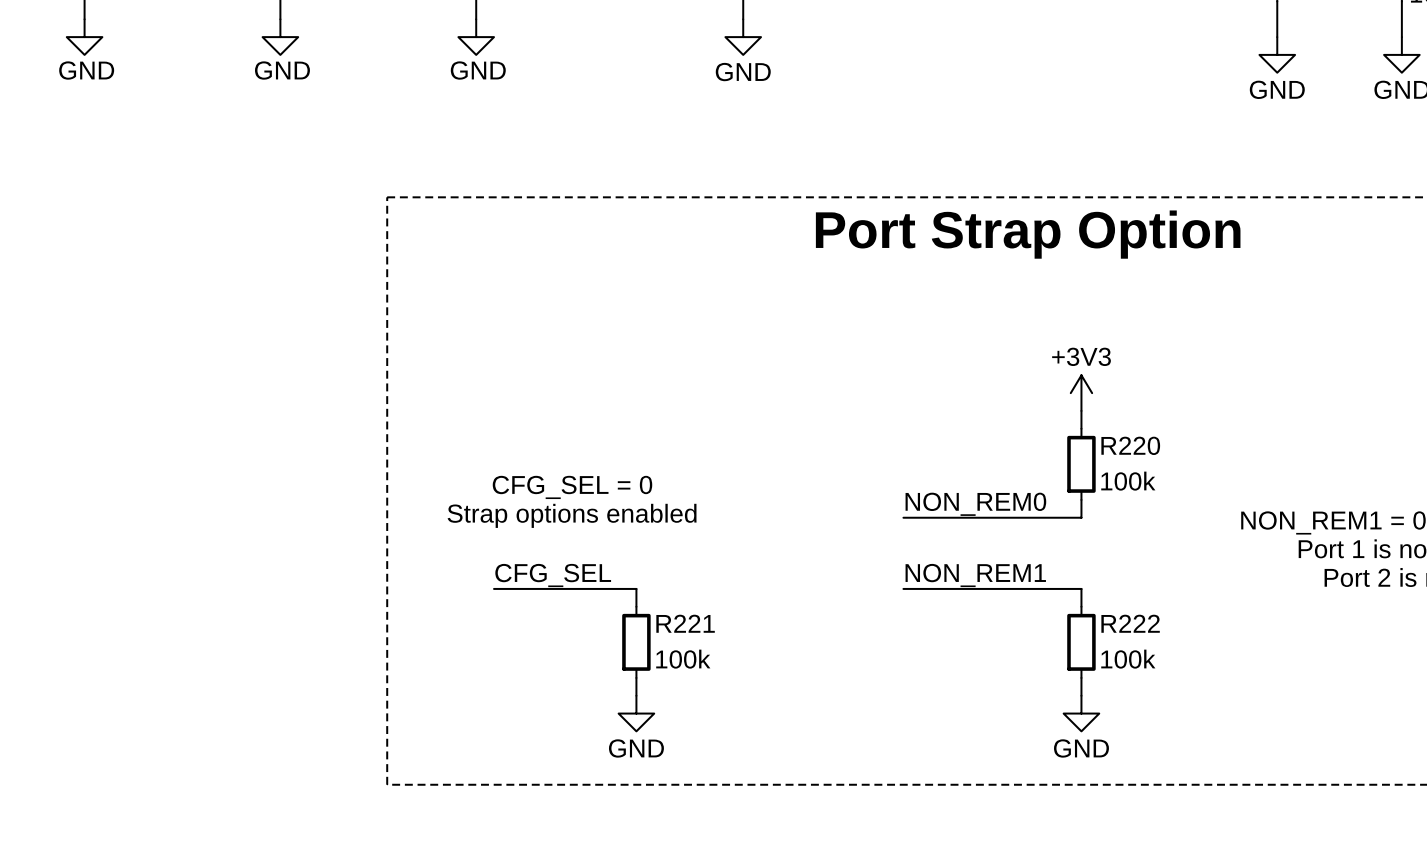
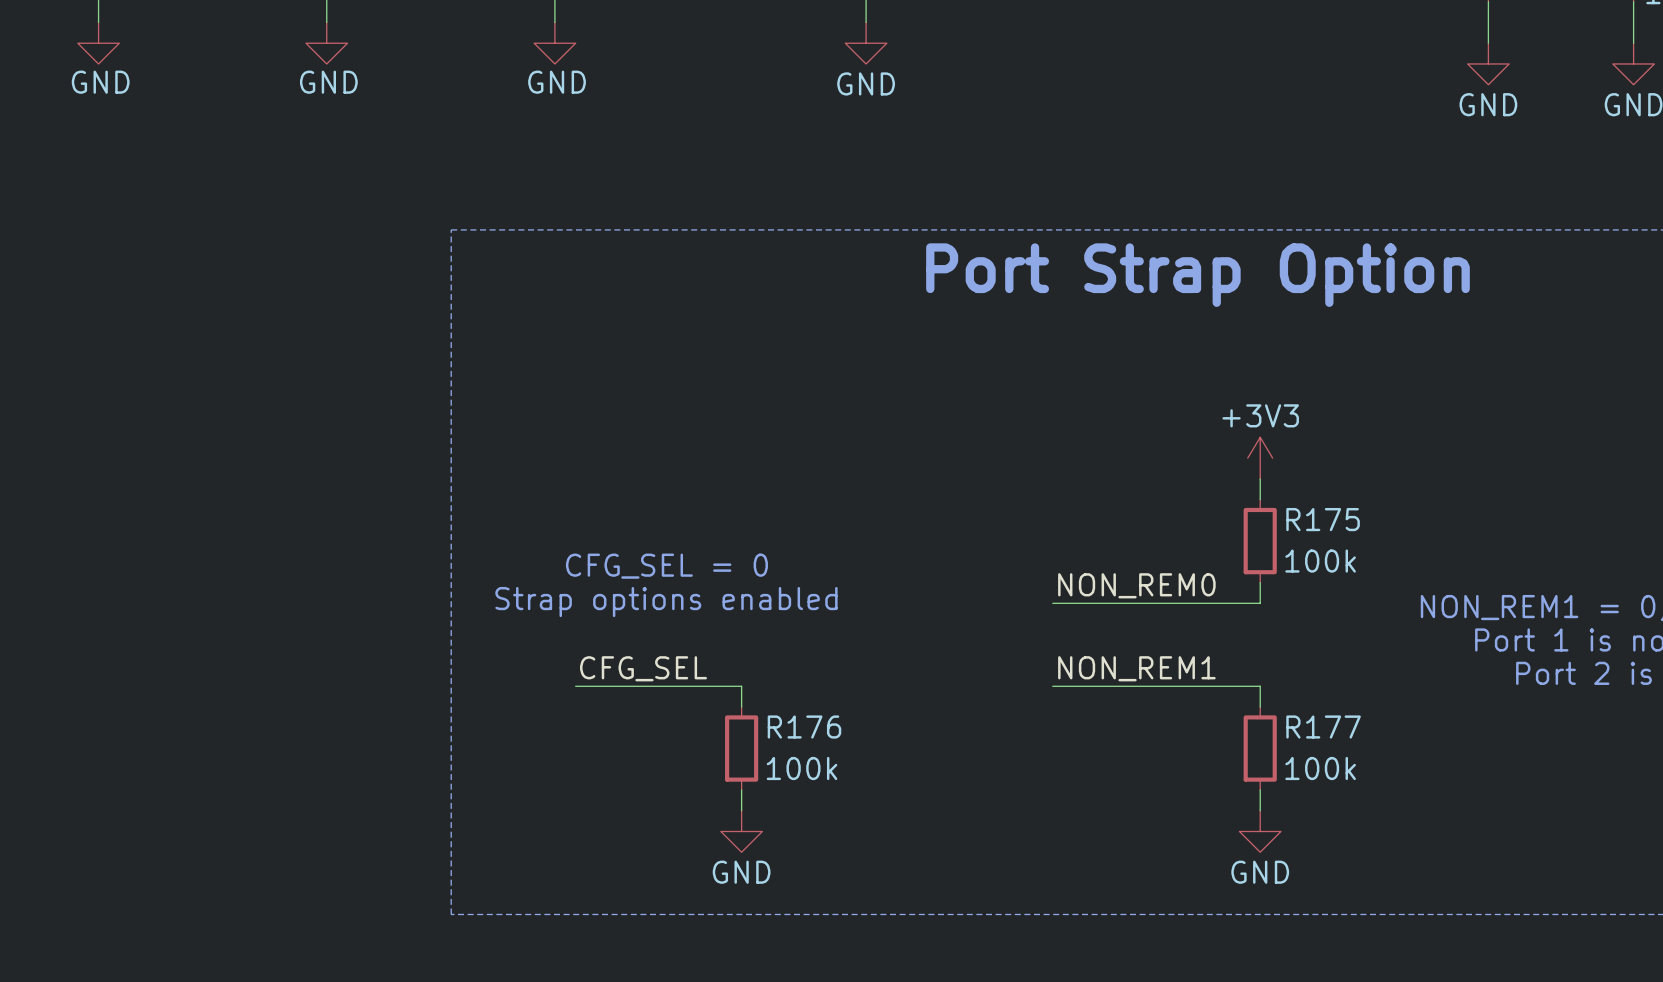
R220 name: R220 (1130, 445) -> R175 (1323, 519)
R221 name: R221 (685, 623) -> R176 (804, 727)
R222 name: R222 (1130, 623) -> R177 (1323, 727)

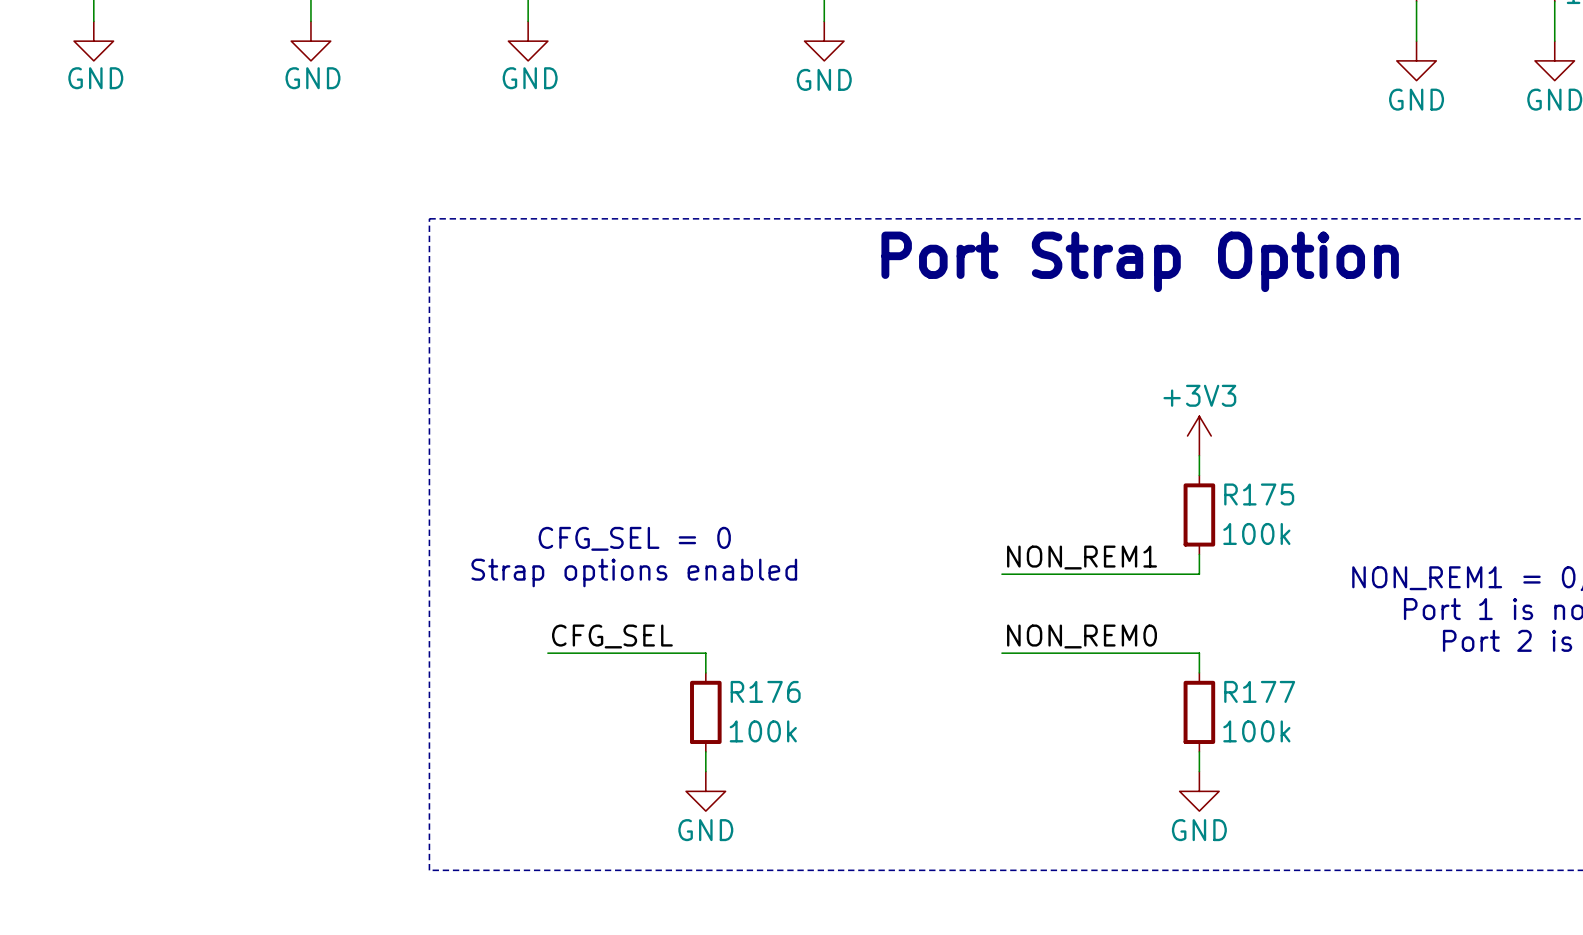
label: NON_REM0 (1136, 585) -> NON_REM1 (1082, 557)
label: NON_REM1 (1136, 668) -> NON_REM0 (1082, 636)

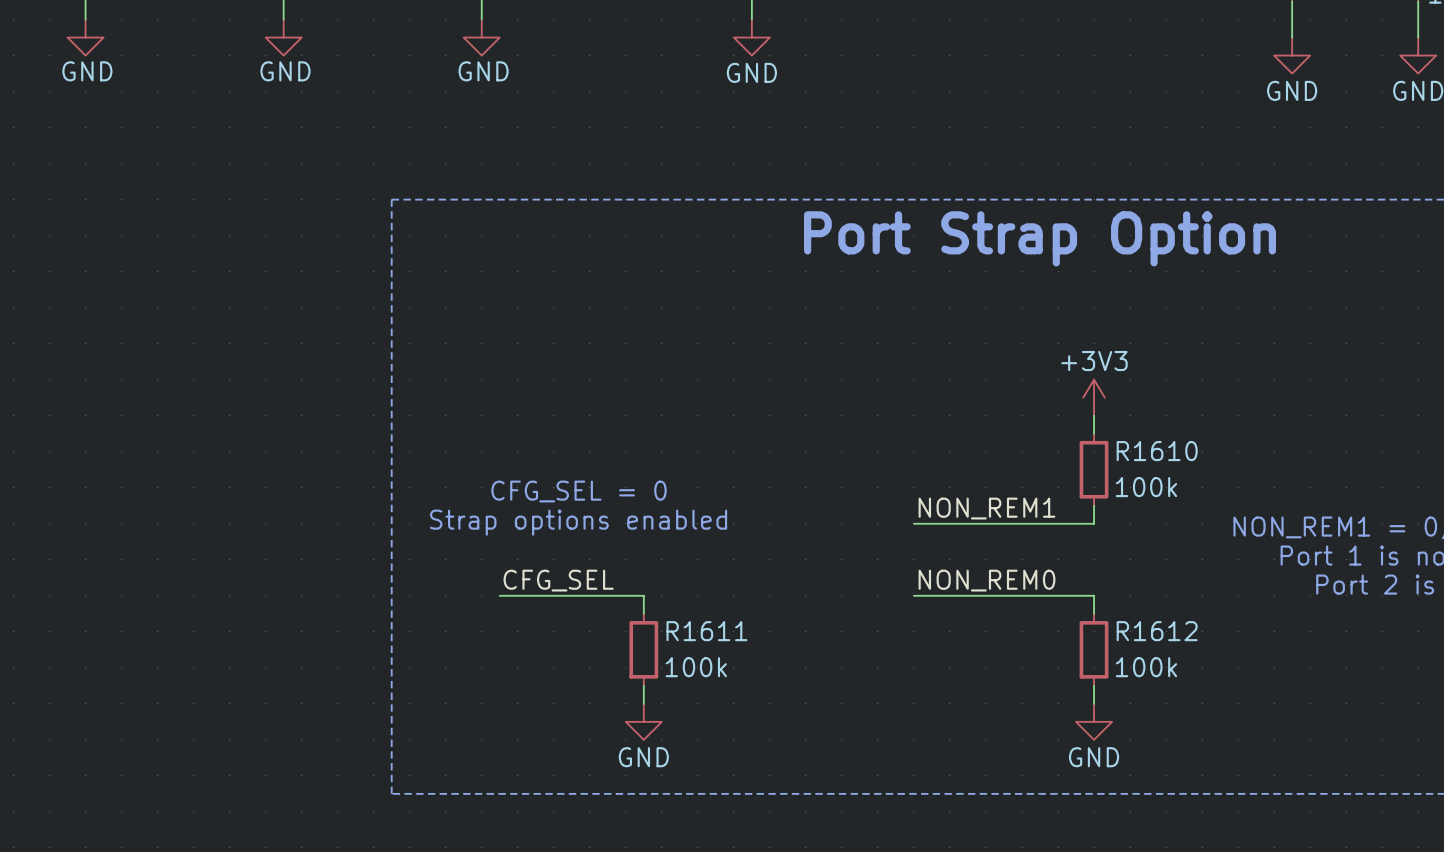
R175 name: R175 (1259, 494) -> R1610 (1157, 451)
R176 name: R176 (765, 691) -> R1611 (706, 631)
R177 name: R177 (1259, 691) -> R1612 (1157, 631)

